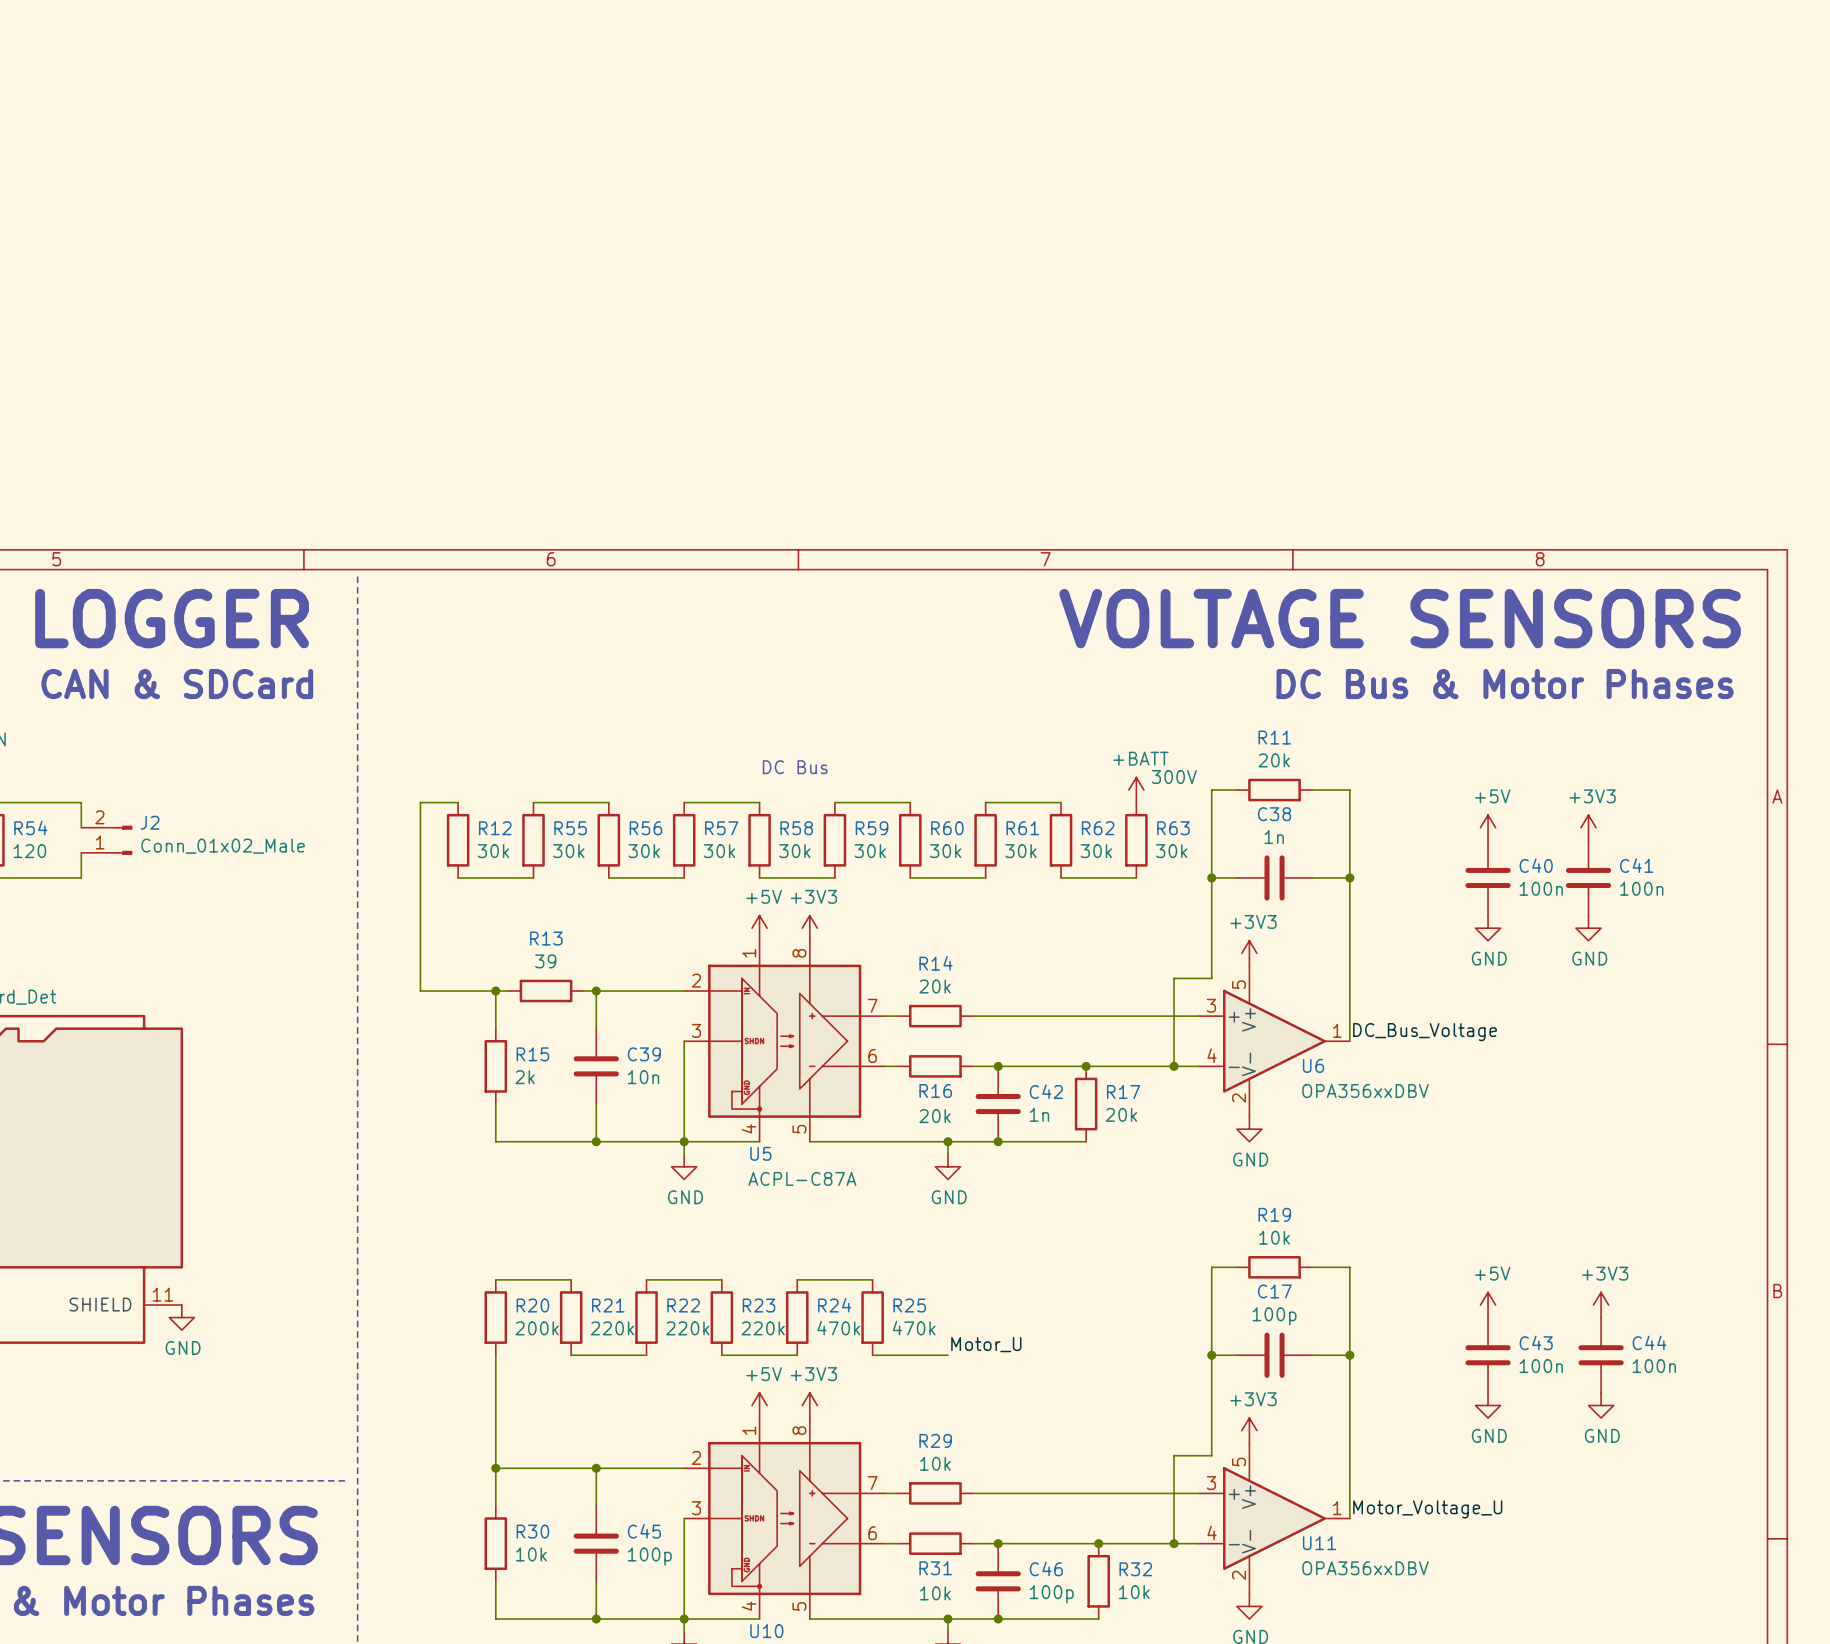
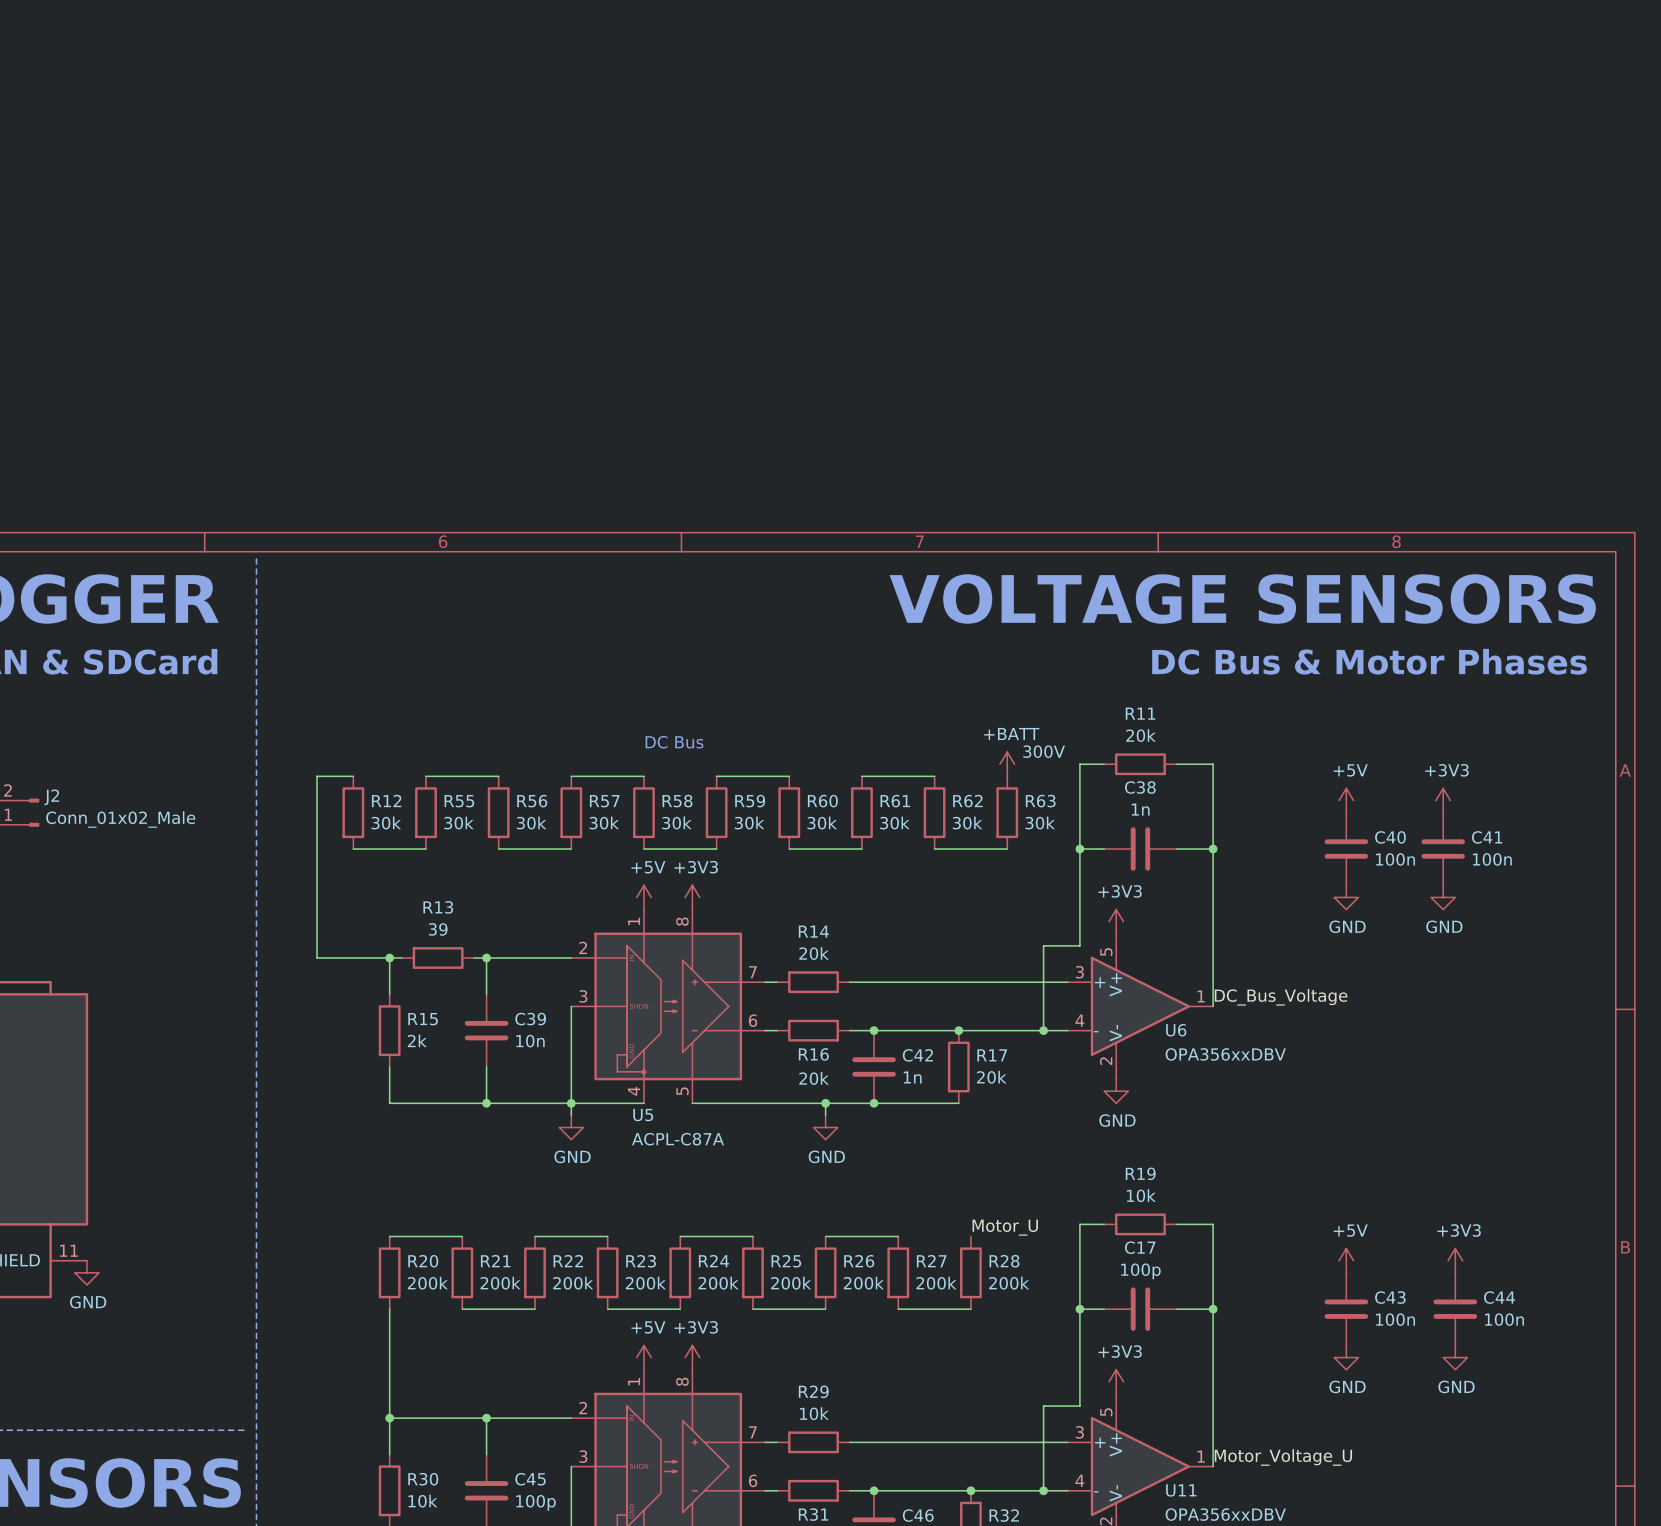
wire: none -> (825, 1236) (898, 1236)
R26: none -> 200k (825, 1272)
R27: none -> 200k (898, 1272)
R28: none -> 200k (970, 1272)
R21 value: 220k (612, 1328) -> 200k (500, 1283)
R22 value: 220k (687, 1328) -> 200k (573, 1283)
R23 value: 220k (763, 1328) -> 200k (645, 1283)
R24 value: 470k (838, 1328) -> 200k (718, 1283)
R25 value: 470k (914, 1328) -> 200k (791, 1283)
label position: Motor_U (986, 1344) -> Motor_U (1005, 1227)
wire: none -> (898, 1309) (970, 1309)

